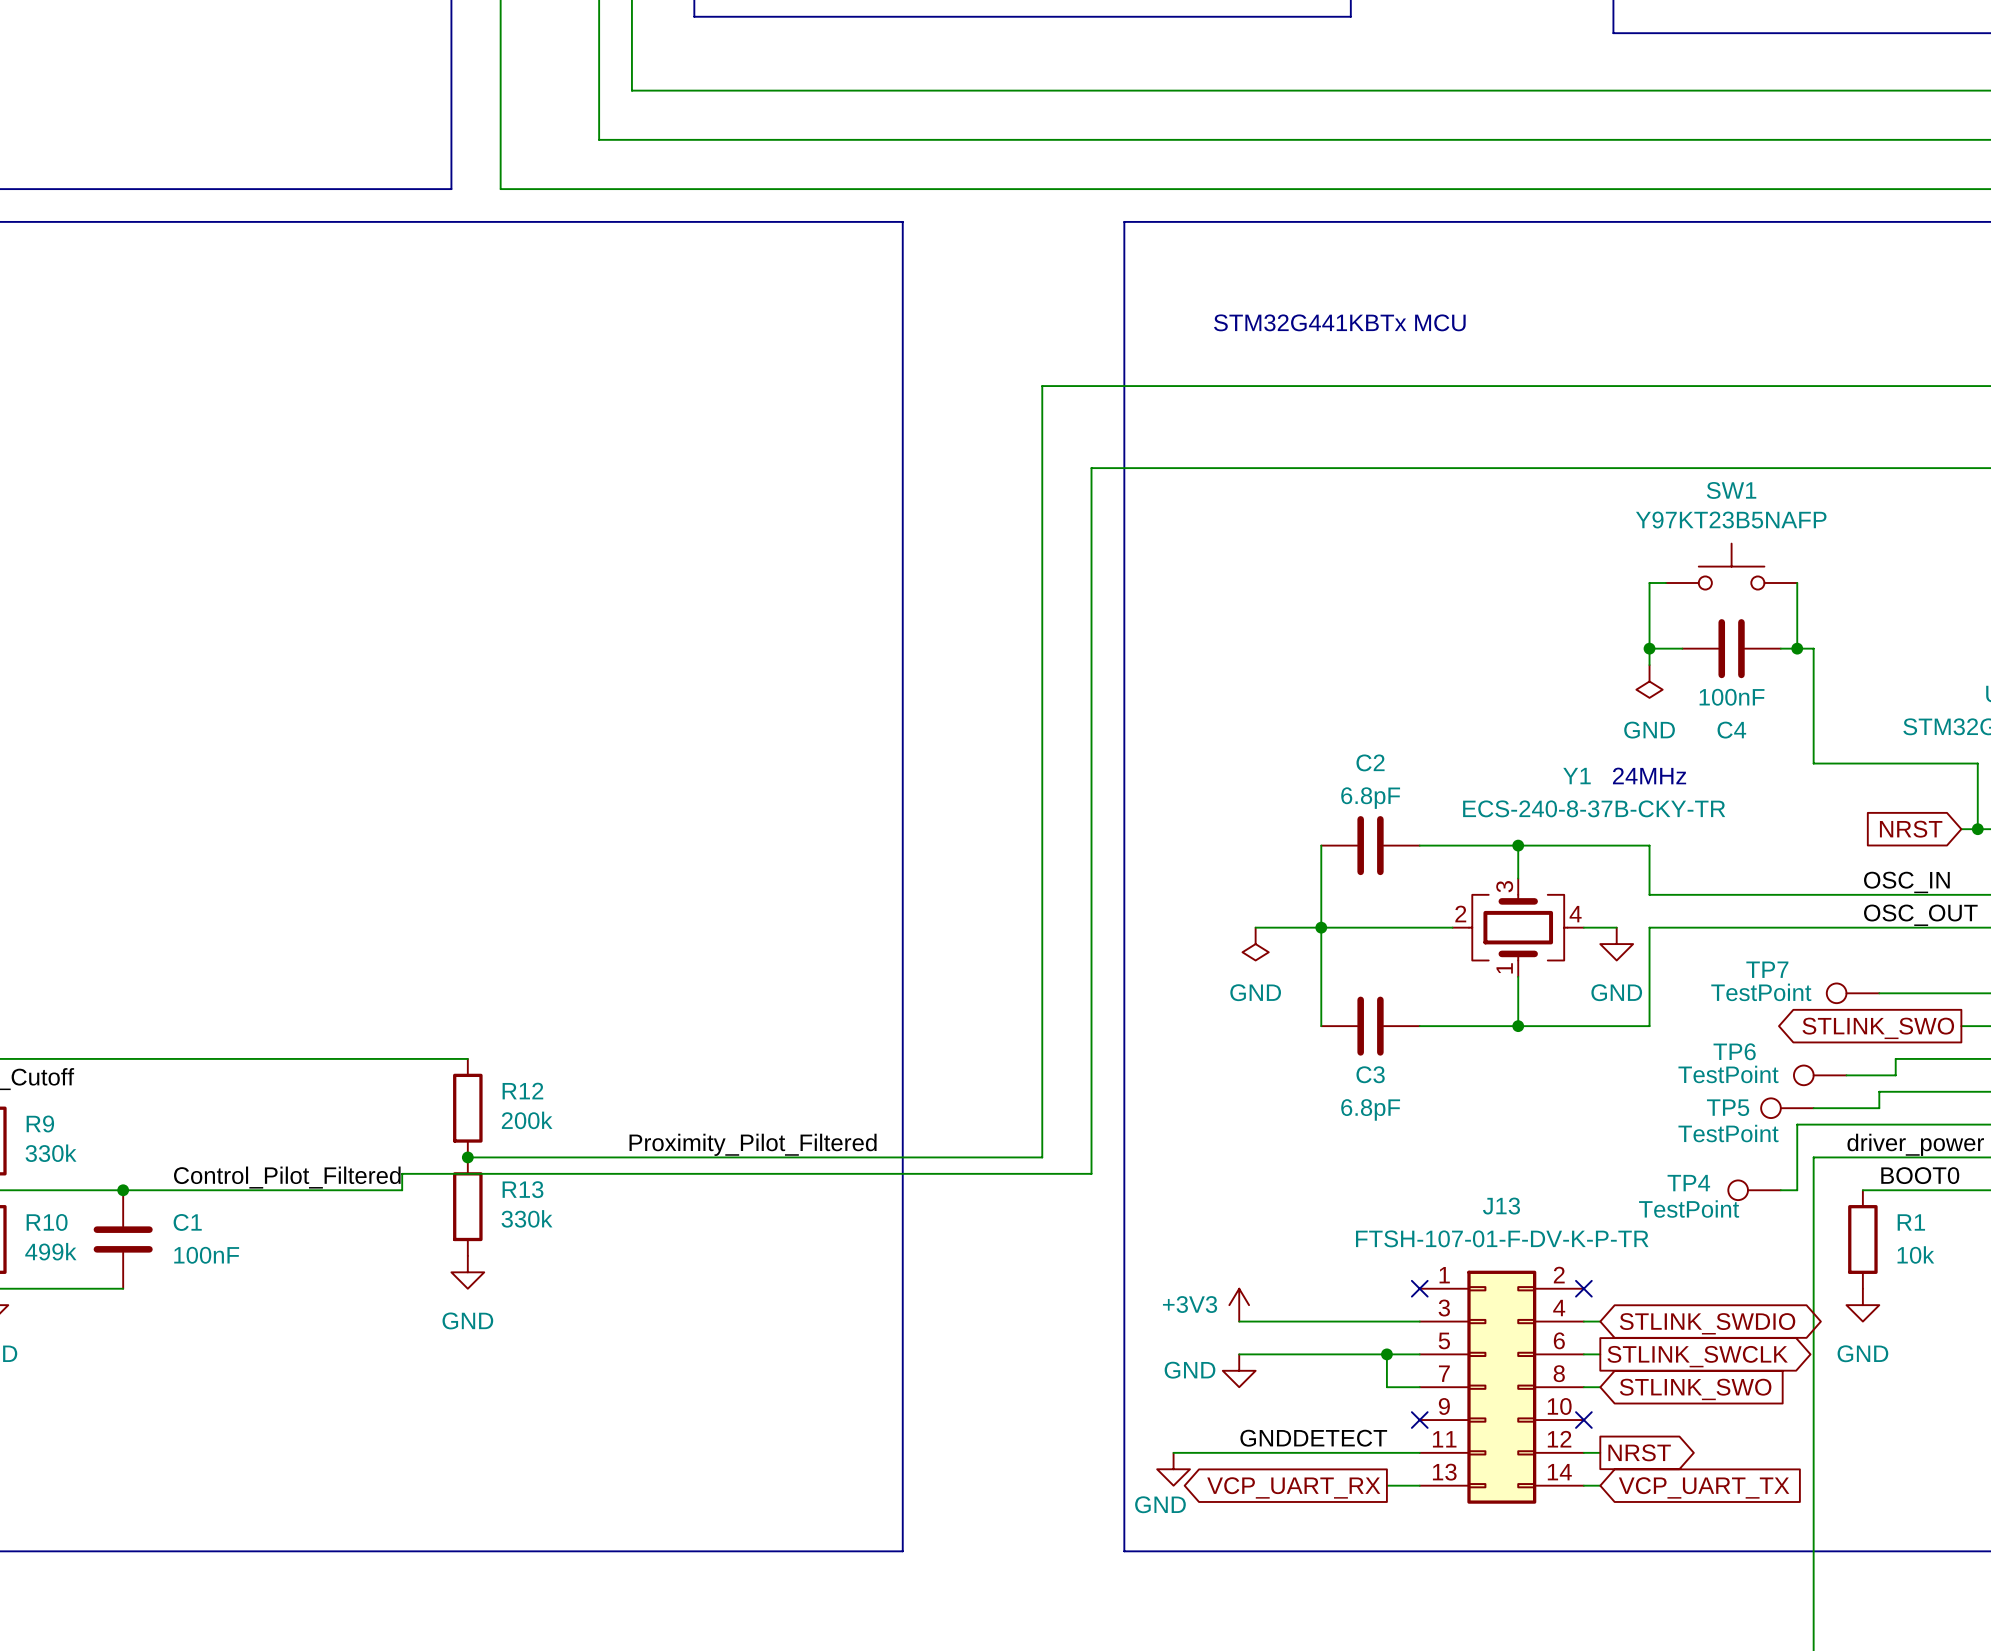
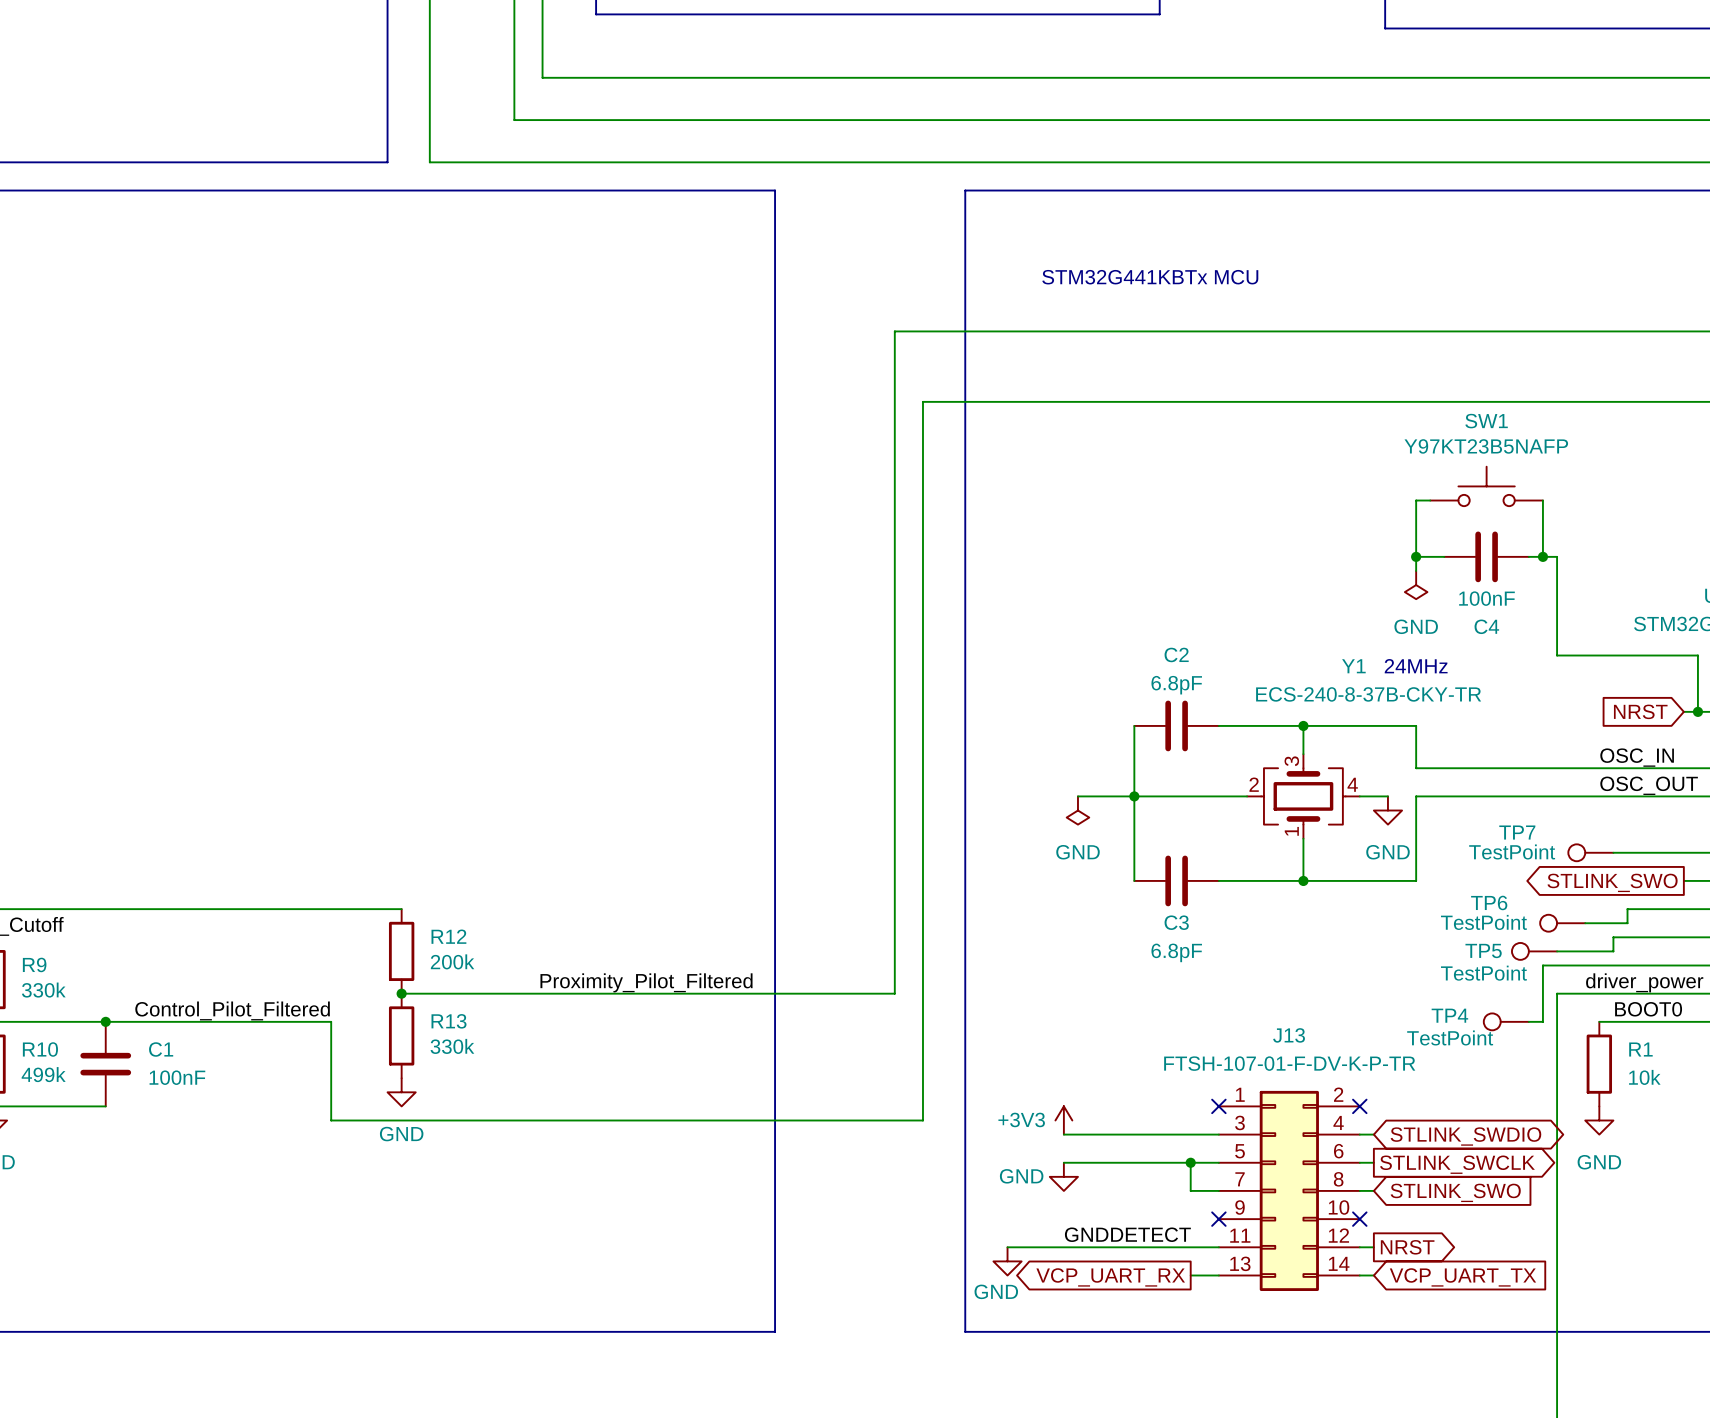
wire: (1091, 468) (1091, 1173) (402, 1173) (402, 1190) (385, 1190) -> (937, 401) (922, 401) (922, 1120) (331, 1120) (331, 1021)
label position: Control_Pilot_Filtered (287, 1177) -> Control_Pilot_Filtered (232, 1010)

